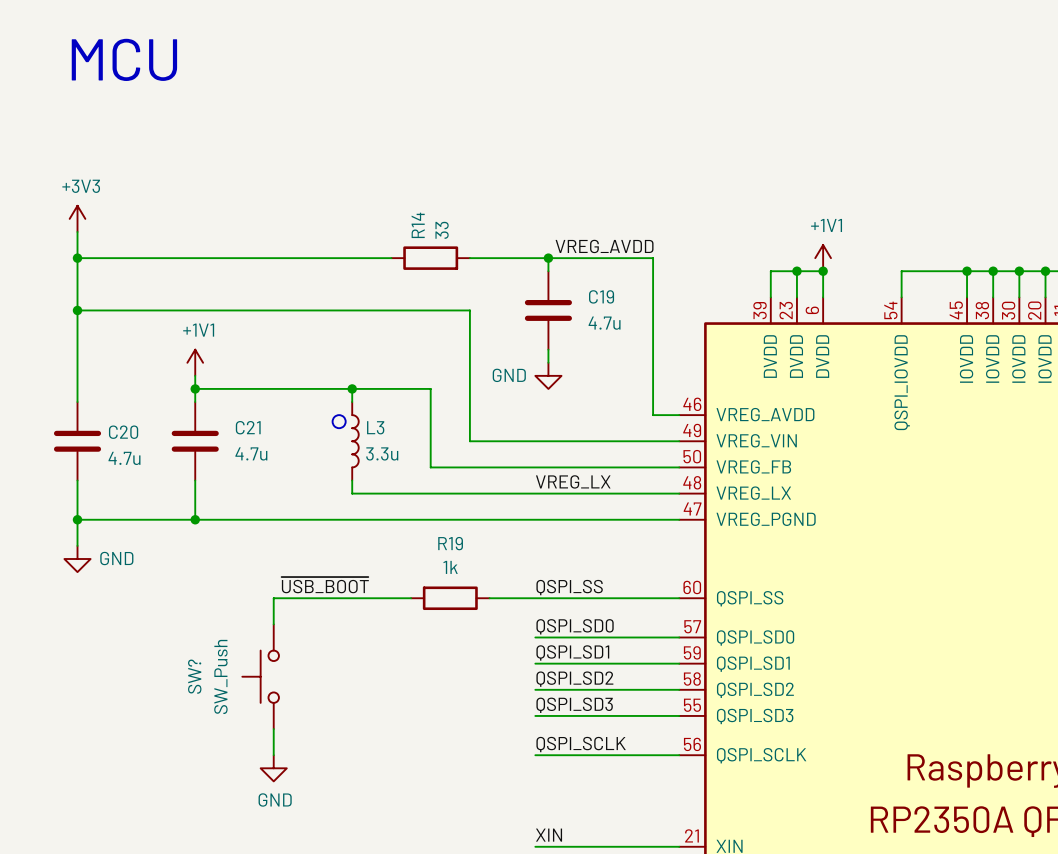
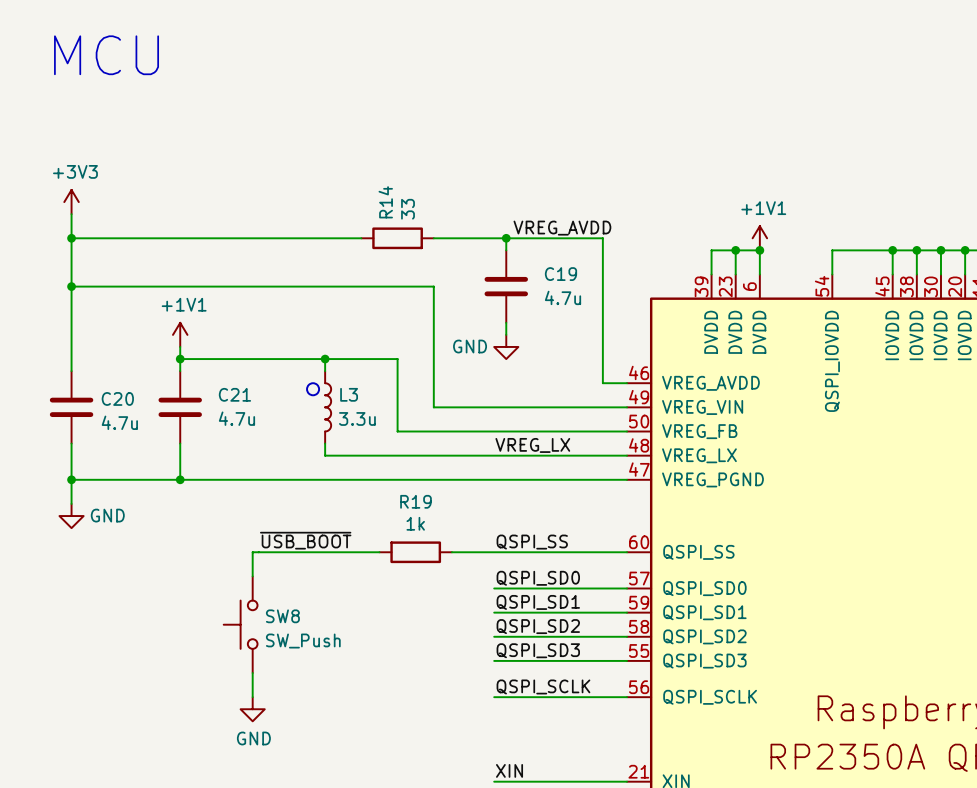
SW? name: SW? (194, 676) -> SW8 (282, 616)
SW? value rotation: 0° (220, 676) -> 90° clockwise (303, 641)
SW? value position: SW_Push (220, 676) -> SW_Push (303, 641)

